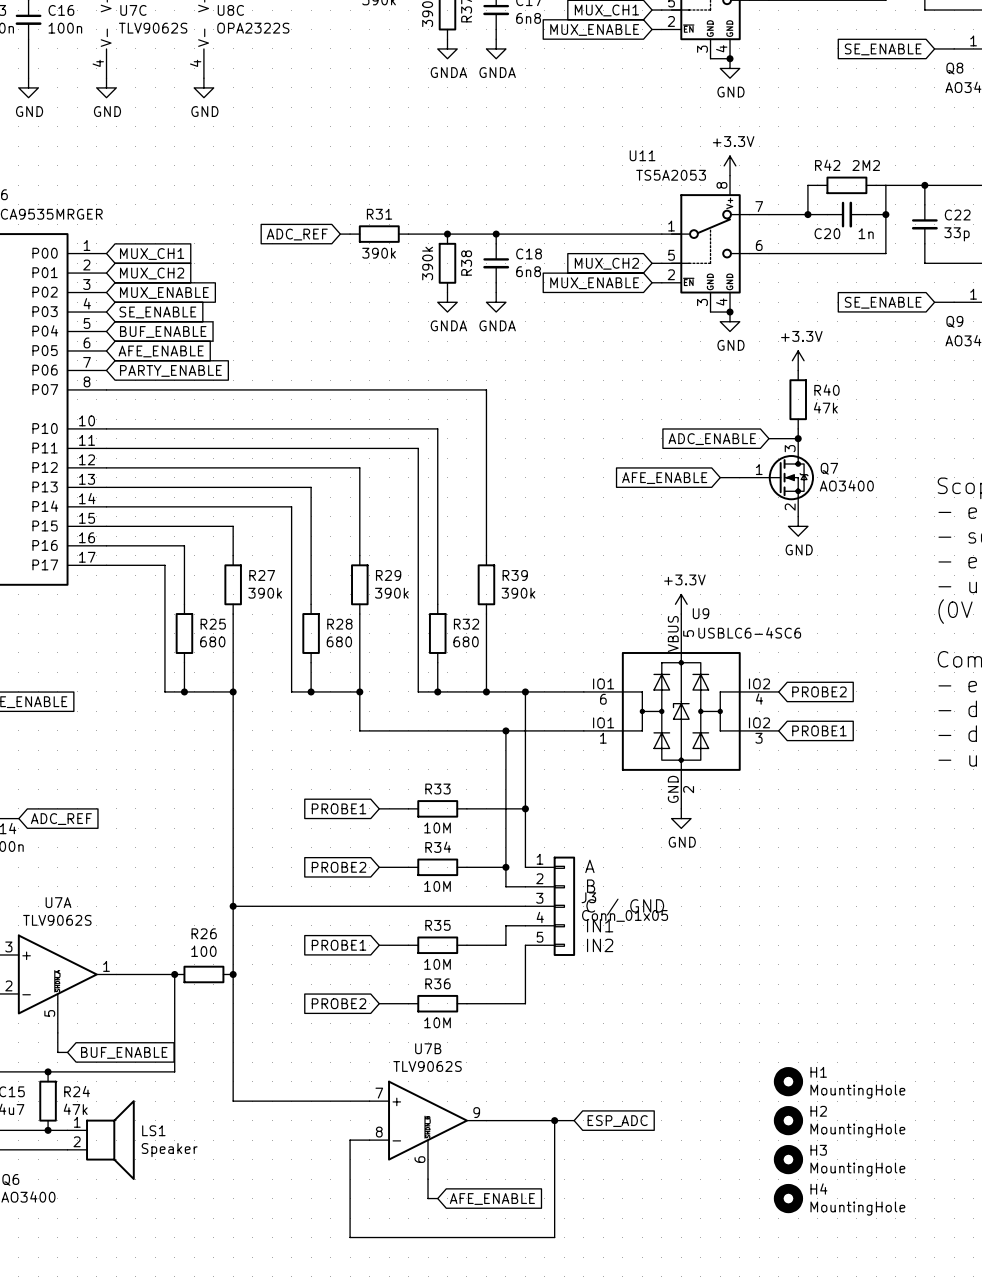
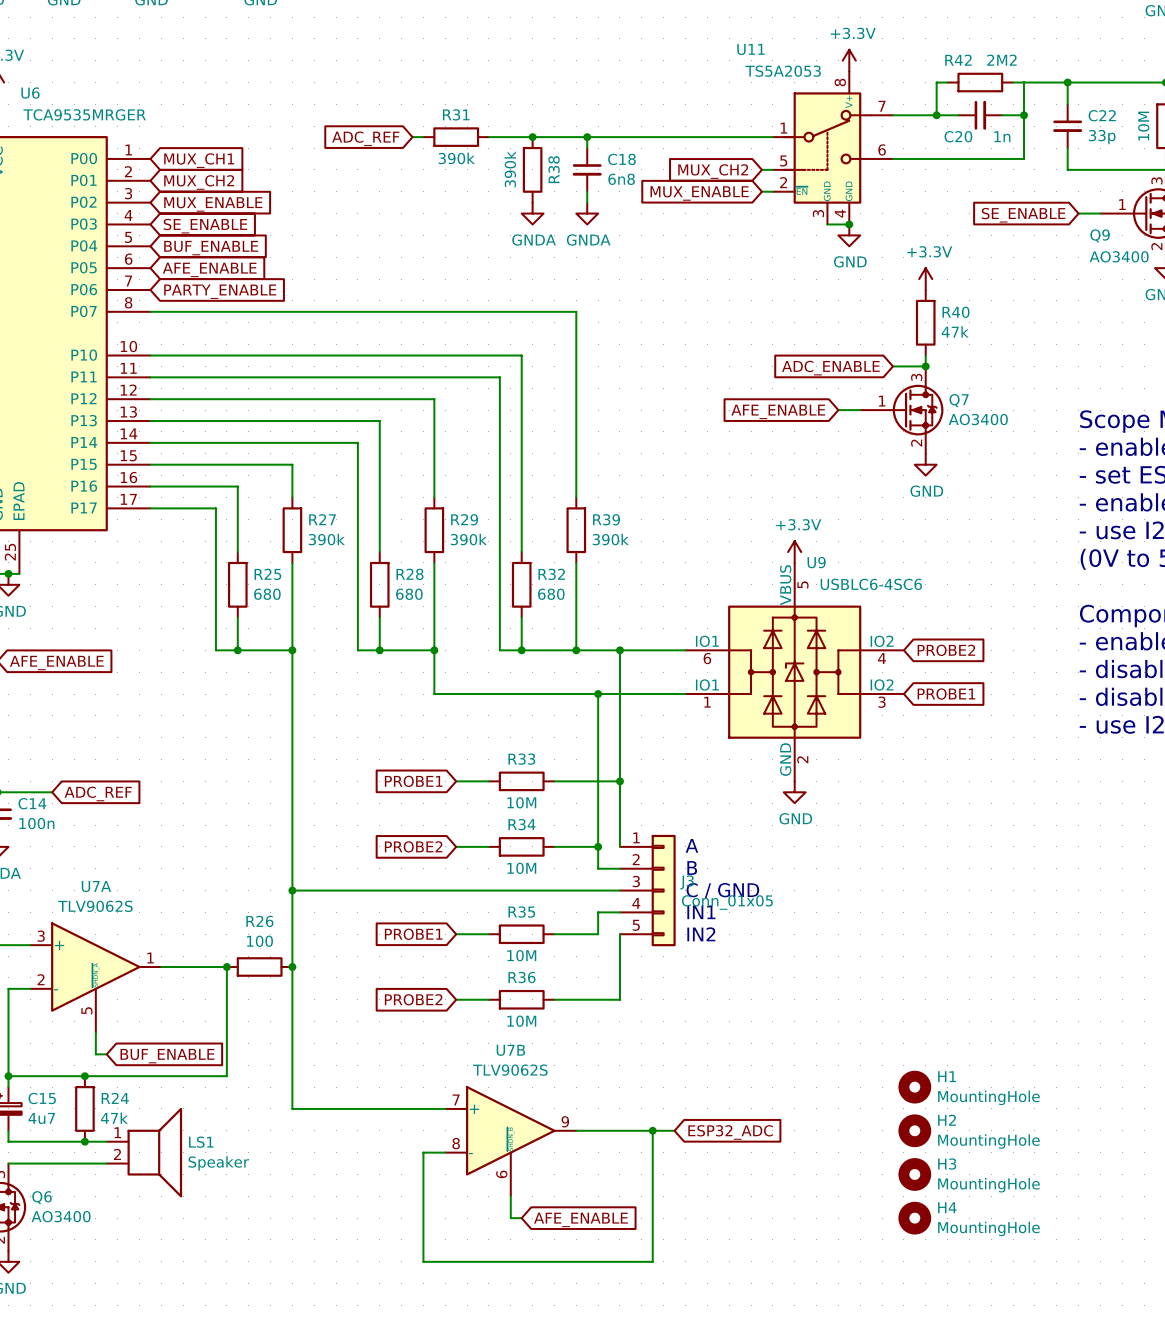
global label: ESP_ADC (617, 1121) -> ESP32_ADC (730, 1132)

